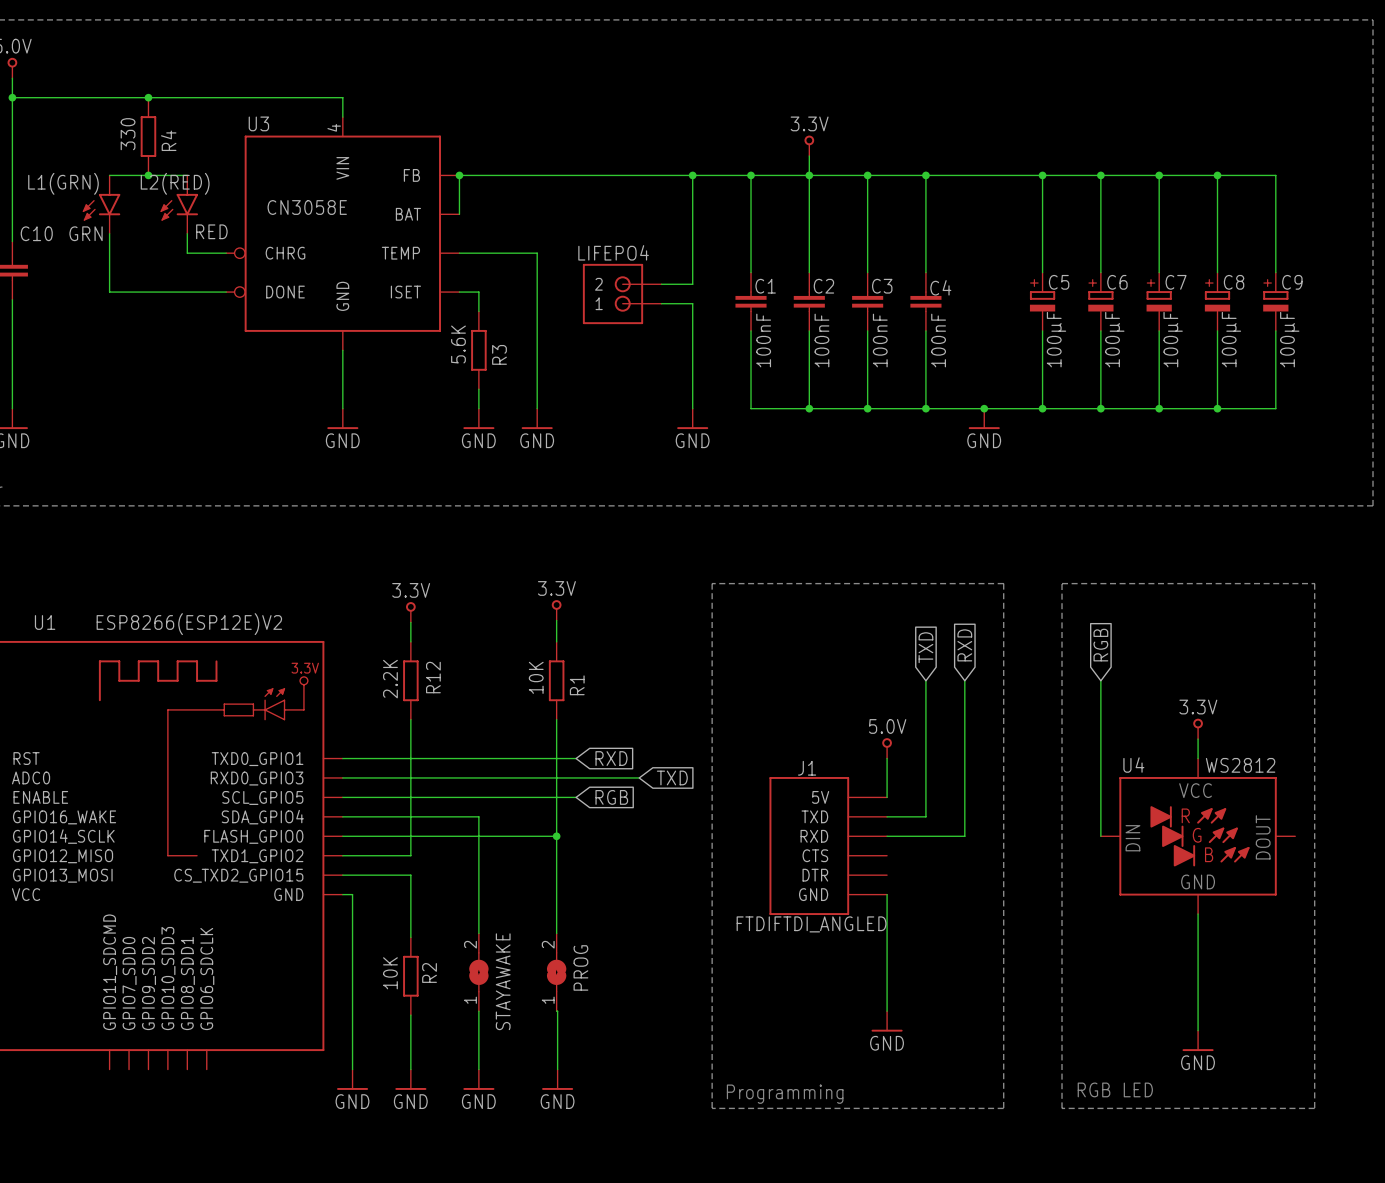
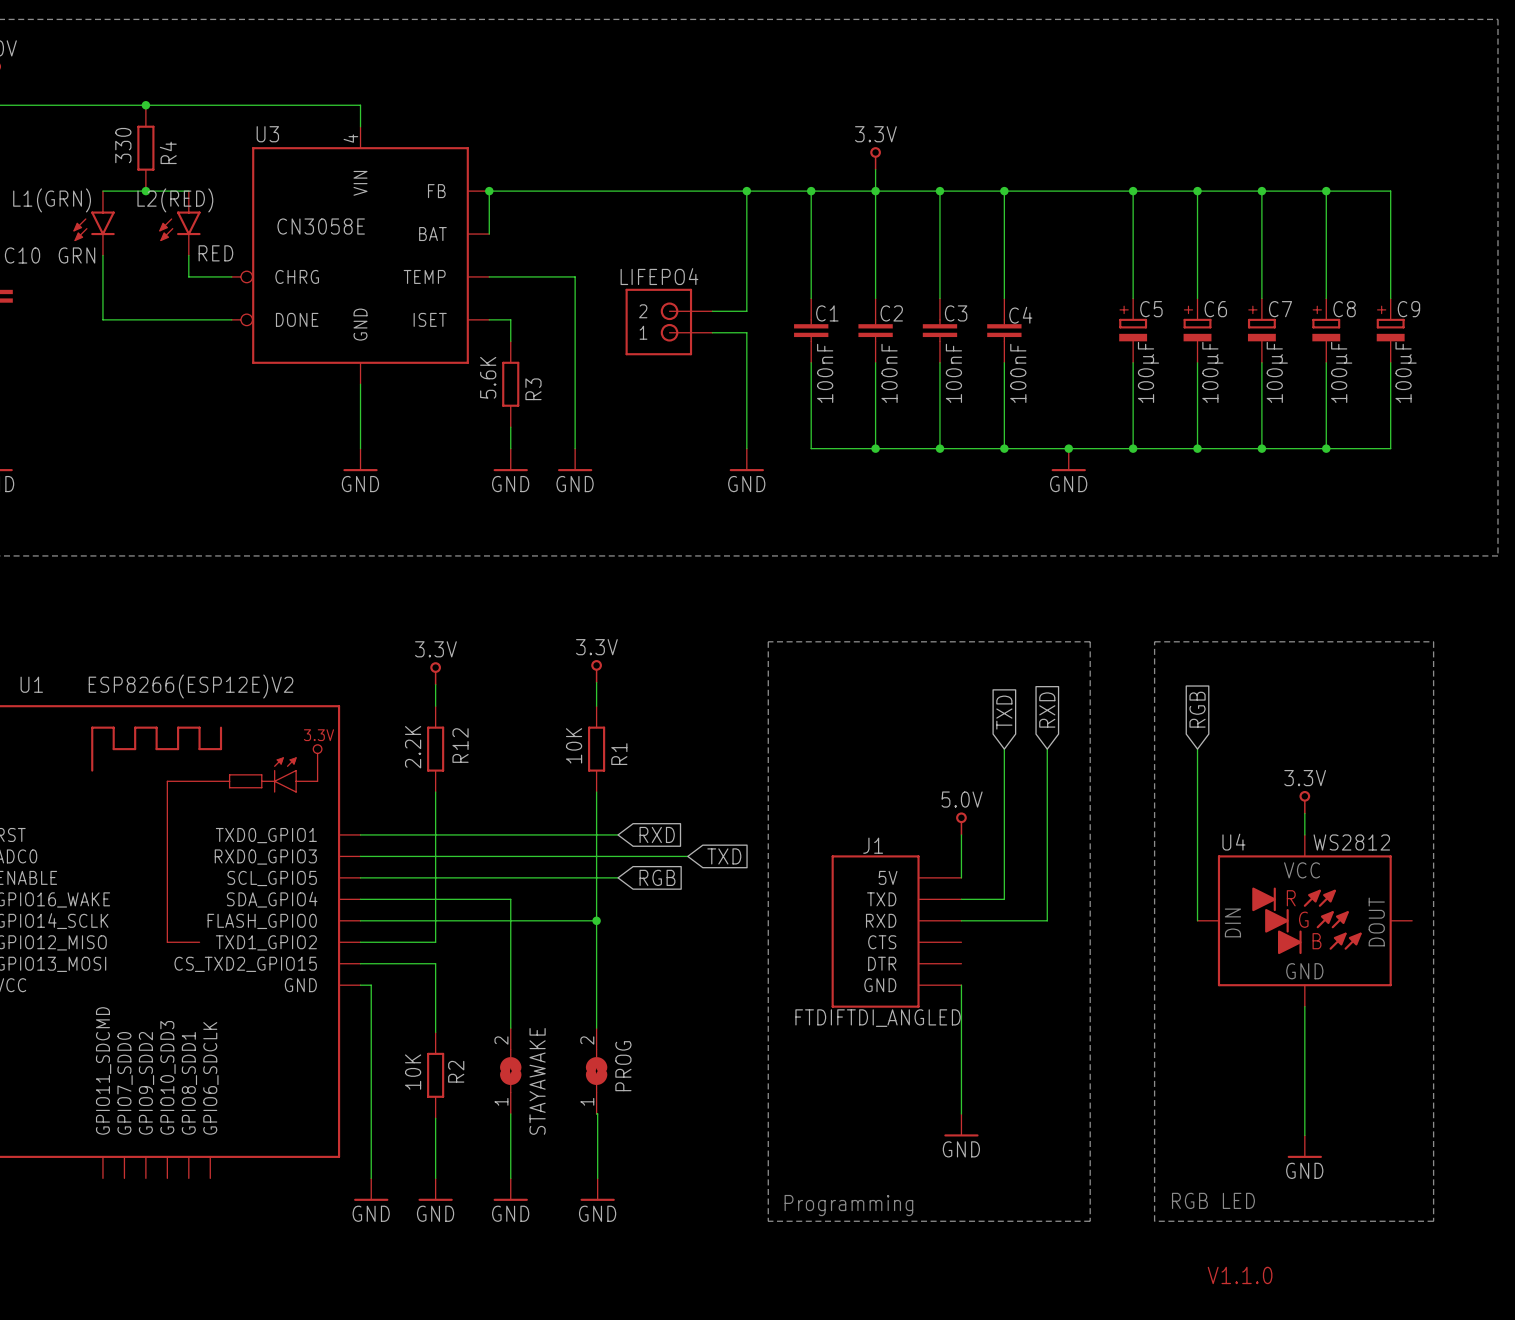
text: none -> V1.1.0 (1240, 1275)

